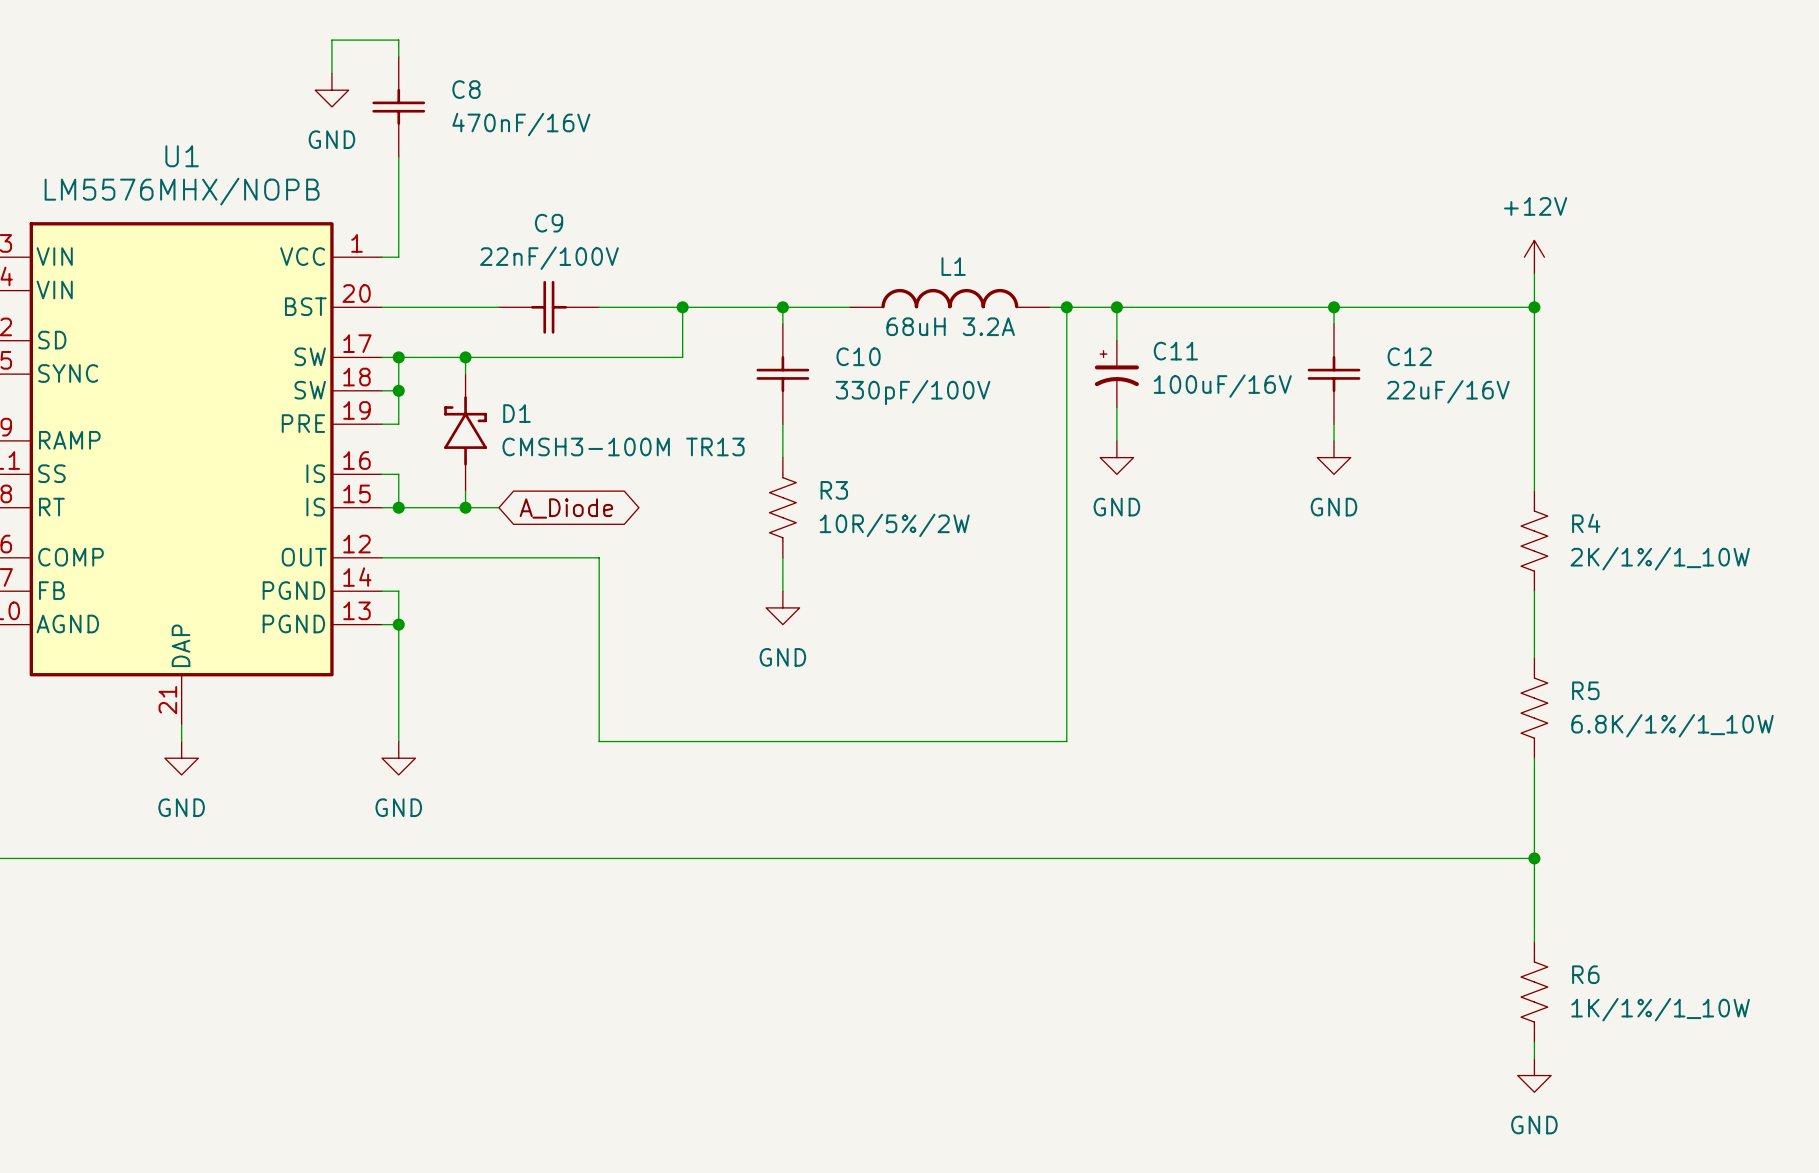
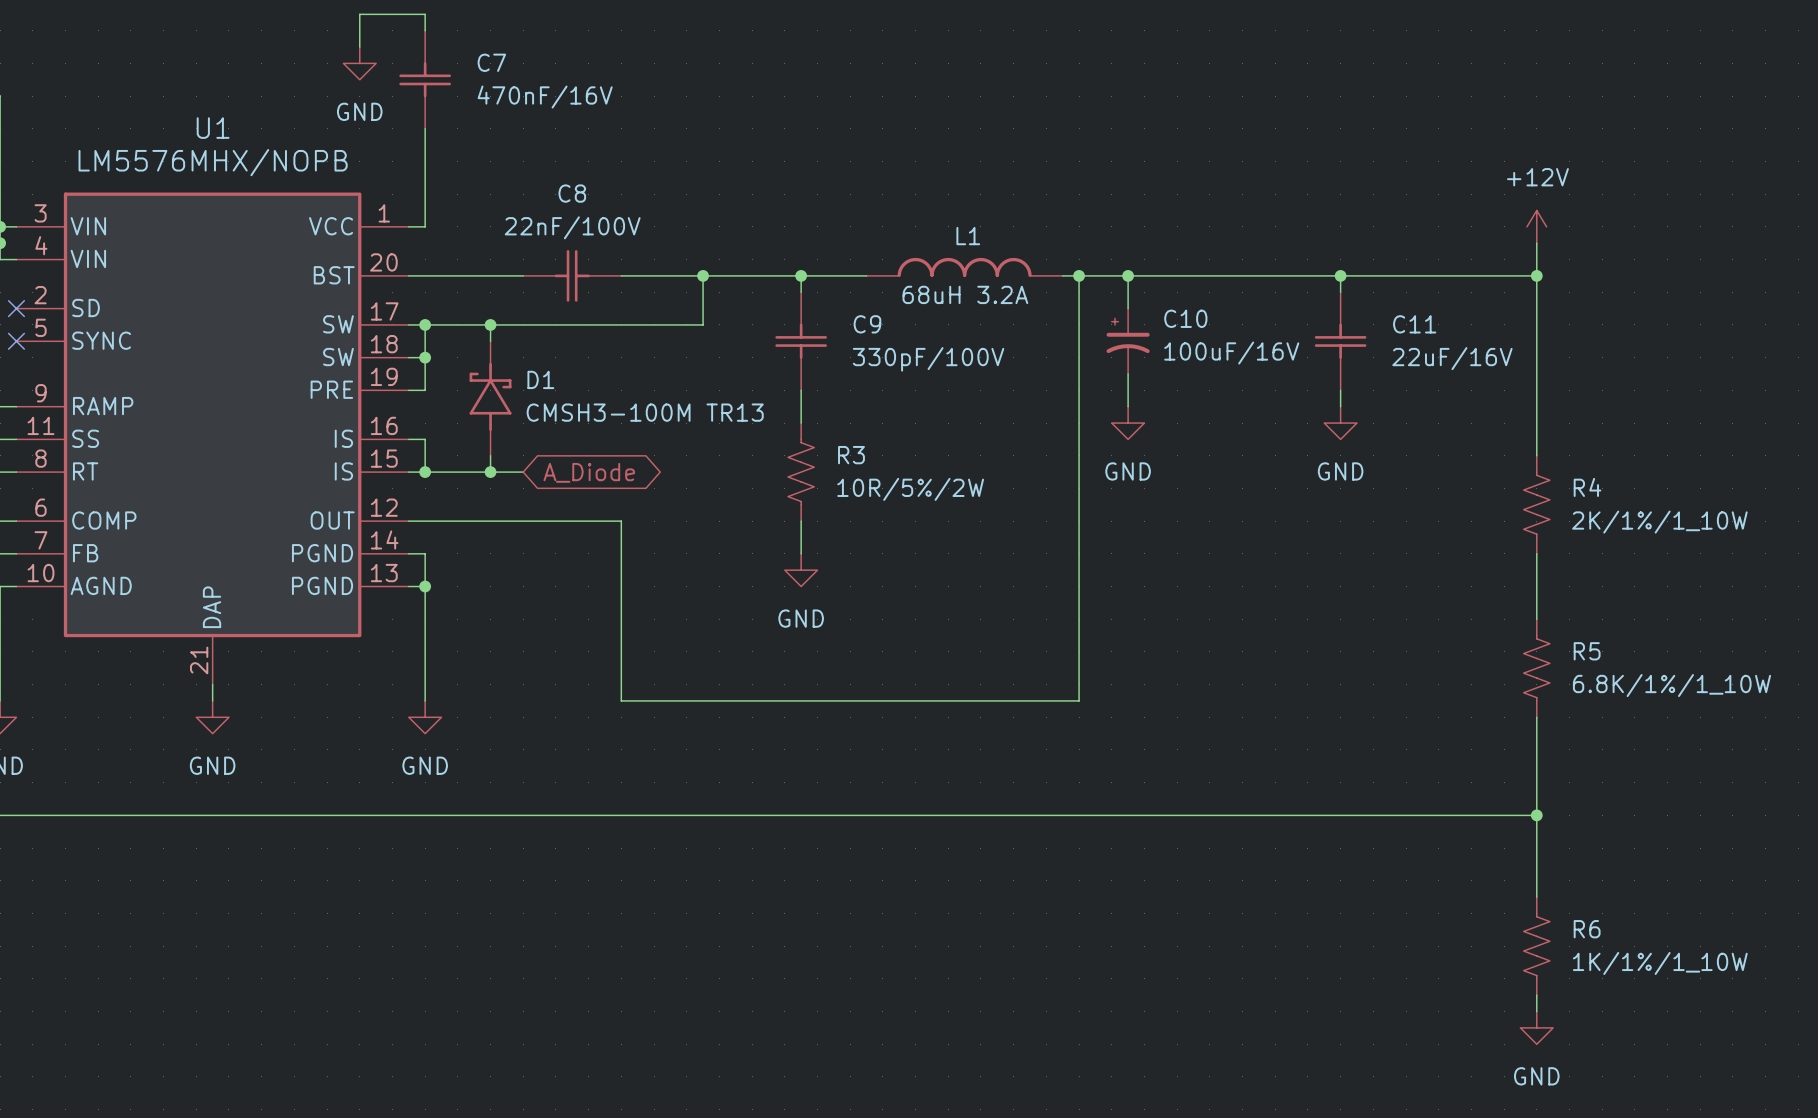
C8 name: C8 (466, 89) -> C7 (491, 62)
C9 name: C9 (549, 223) -> C8 (572, 193)
C11 name: C11 (1175, 351) -> C10 (1185, 318)
C10 name: C10 (858, 356) -> C9 (867, 324)
C12 name: C12 (1409, 356) -> C11 (1414, 324)

